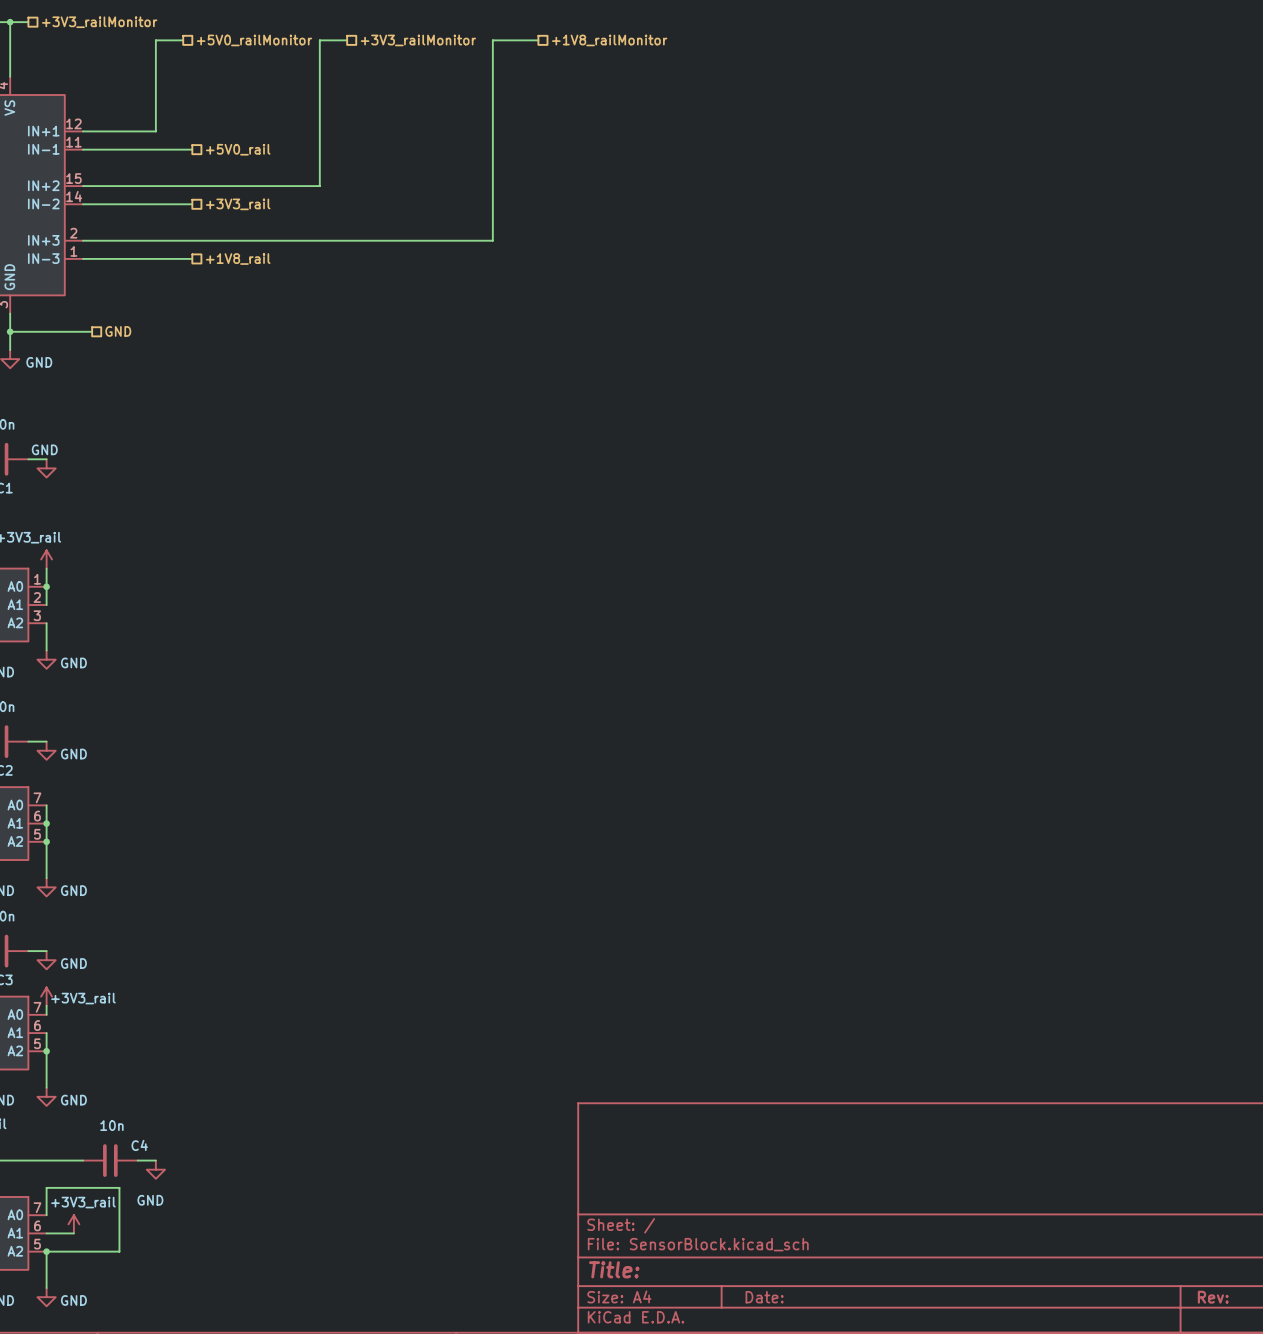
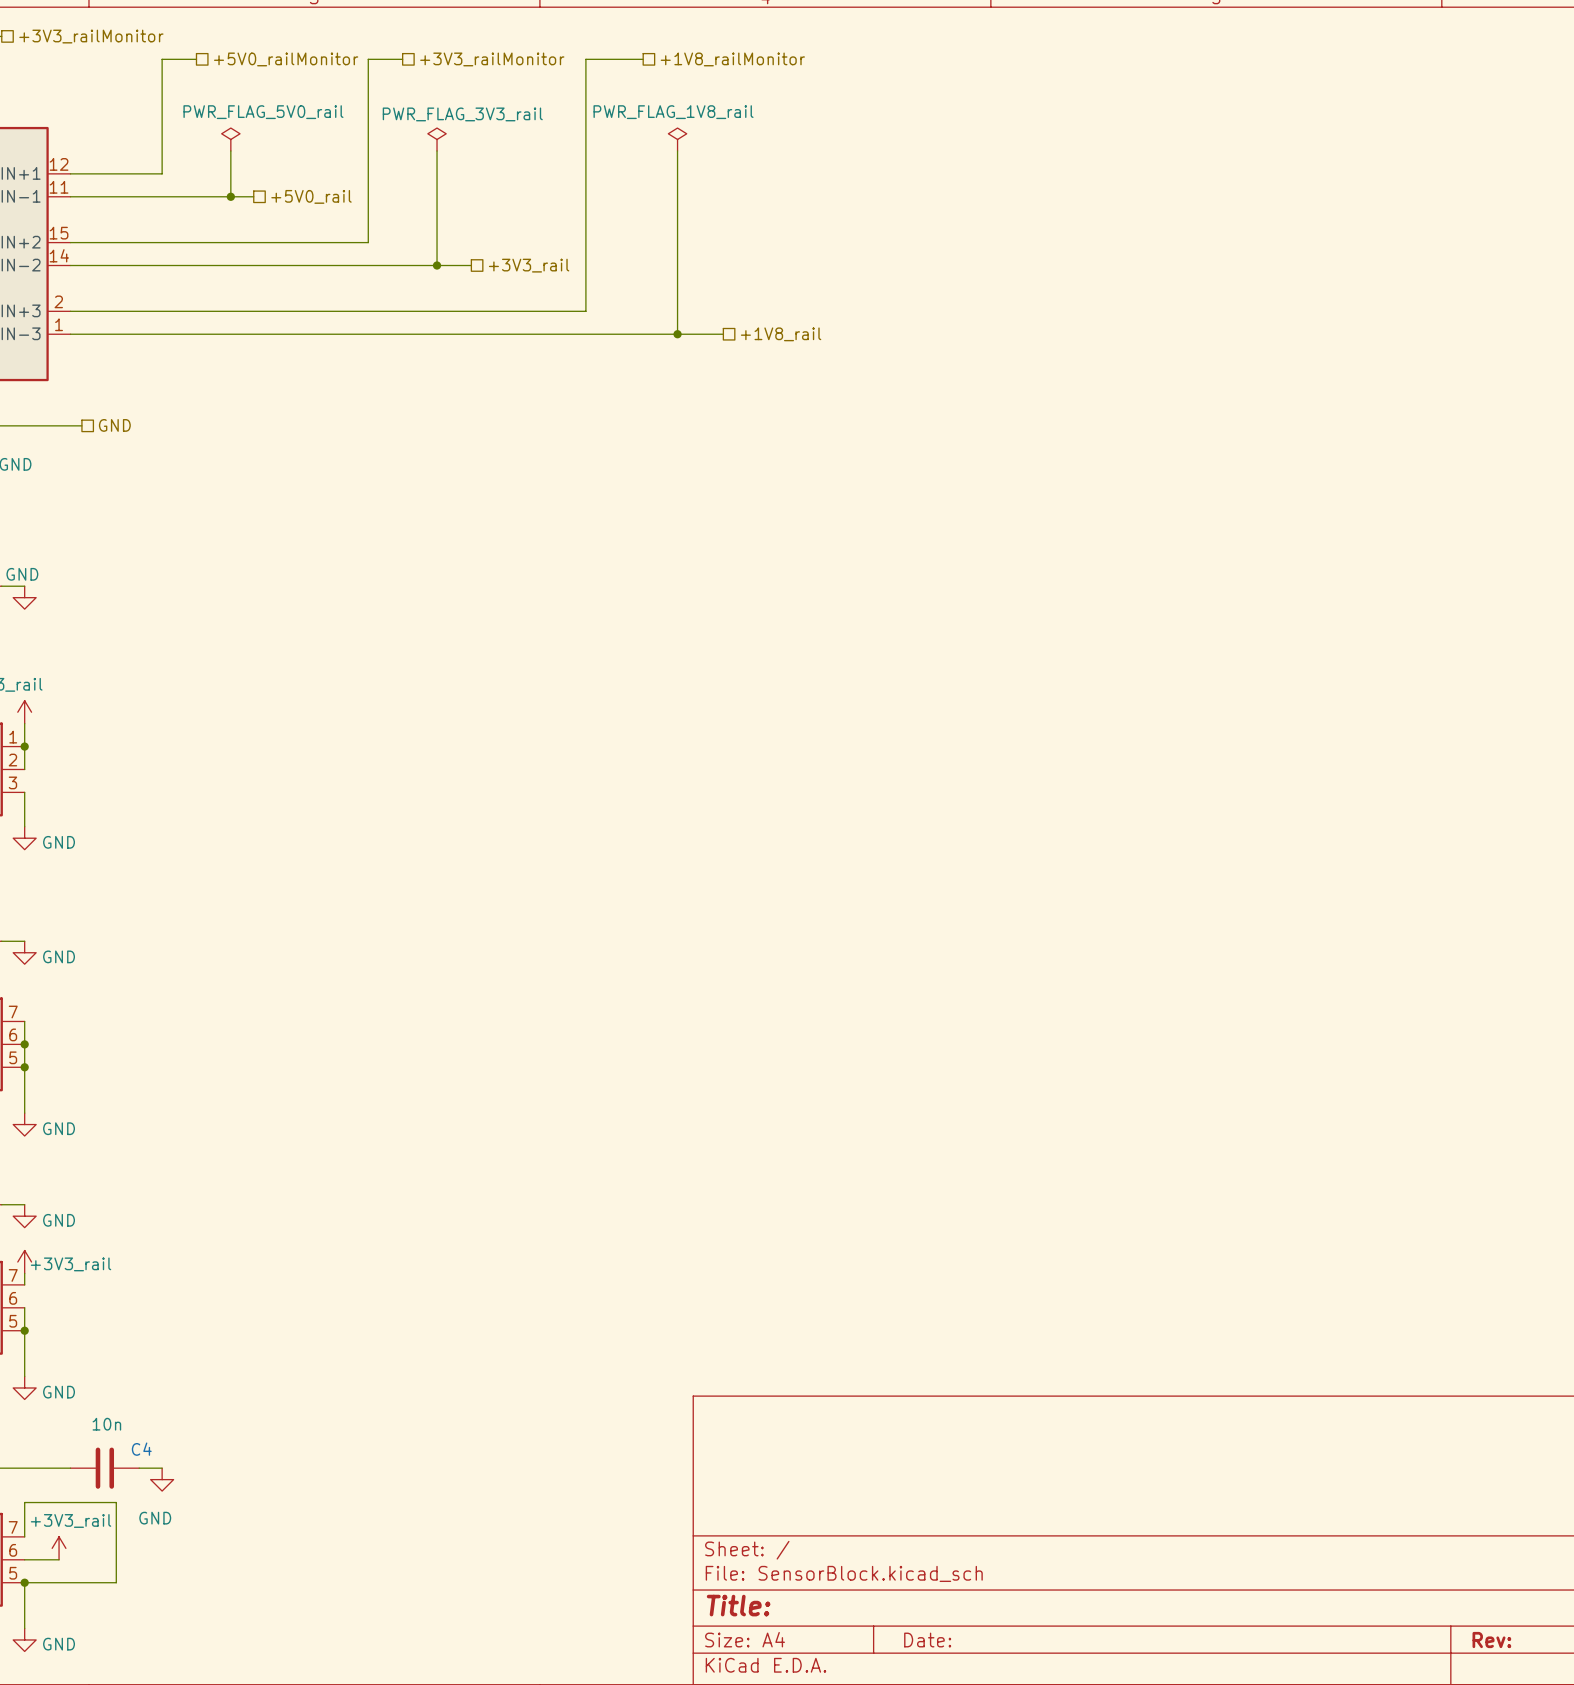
power symbol: none -> PWR_FLAG_5V0_rail (230, 139)
power symbol: none -> PWR_FLAG_3V3_rail (437, 139)
power symbol: none -> PWR_FLAG_1V8_rail (677, 139)
wire: none -> (230, 150) (230, 196)
wire: none -> (437, 150) (437, 265)
wire: none -> (677, 150) (677, 334)
wire: none -> (207, 196) (253, 196)
junction: none -> (230, 196)
hierarchical label position: +5V0_rail (238, 149) -> +5V0_rail (311, 196)
wire: none -> (207, 265) (471, 265)
hierarchical label: +3V3_rail (238, 204) -> none
junction: none -> (437, 265)
hierarchical label: none -> +3V3_rail (529, 265)
wire: none -> (207, 334) (723, 334)
junction: none -> (677, 334)
hierarchical label: +1V8_rail (238, 259) -> none
hierarchical label: none -> +1V8_rail (781, 334)

